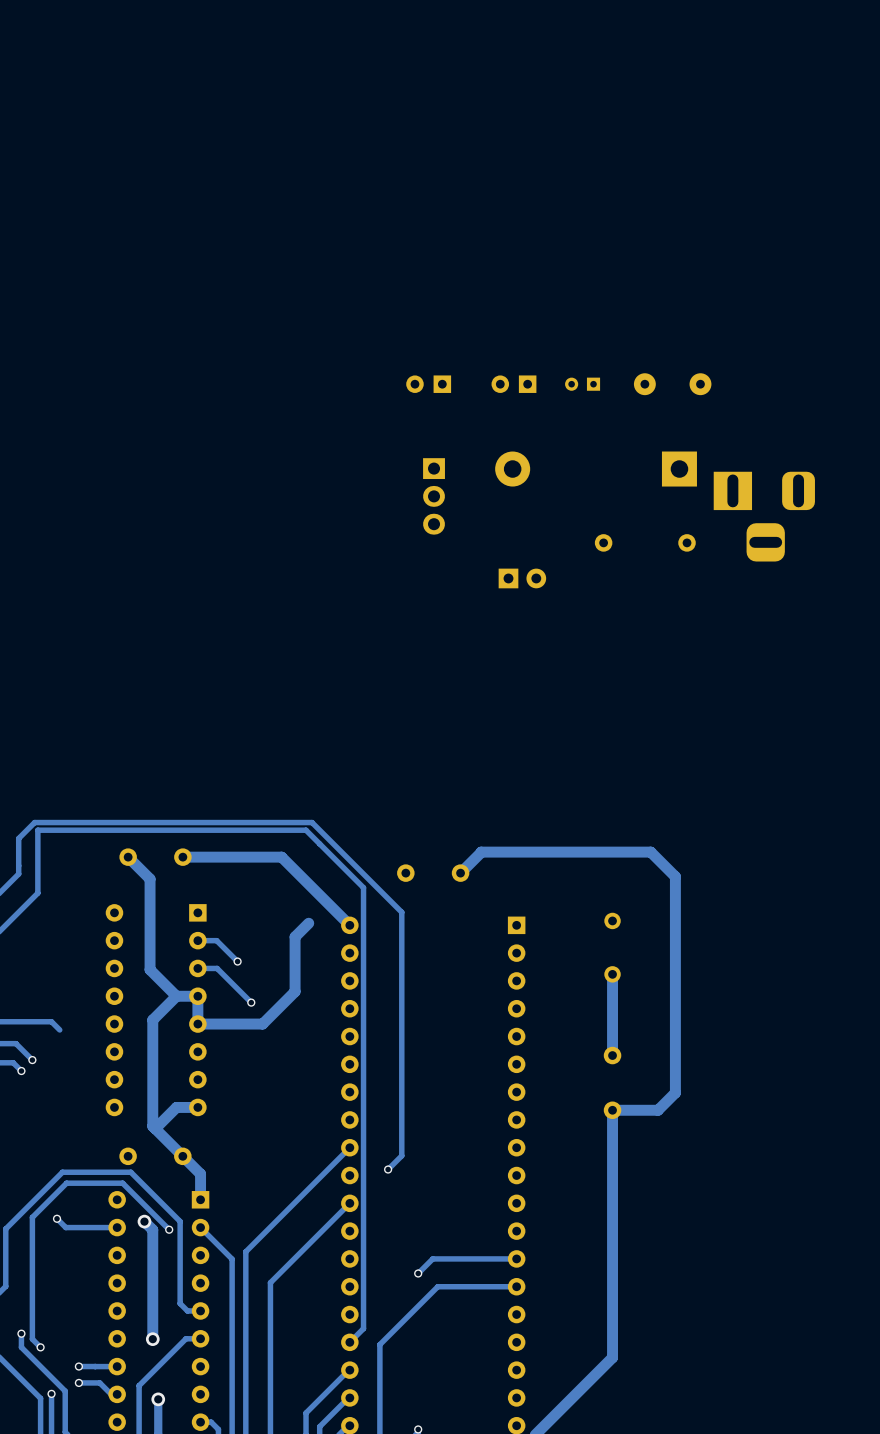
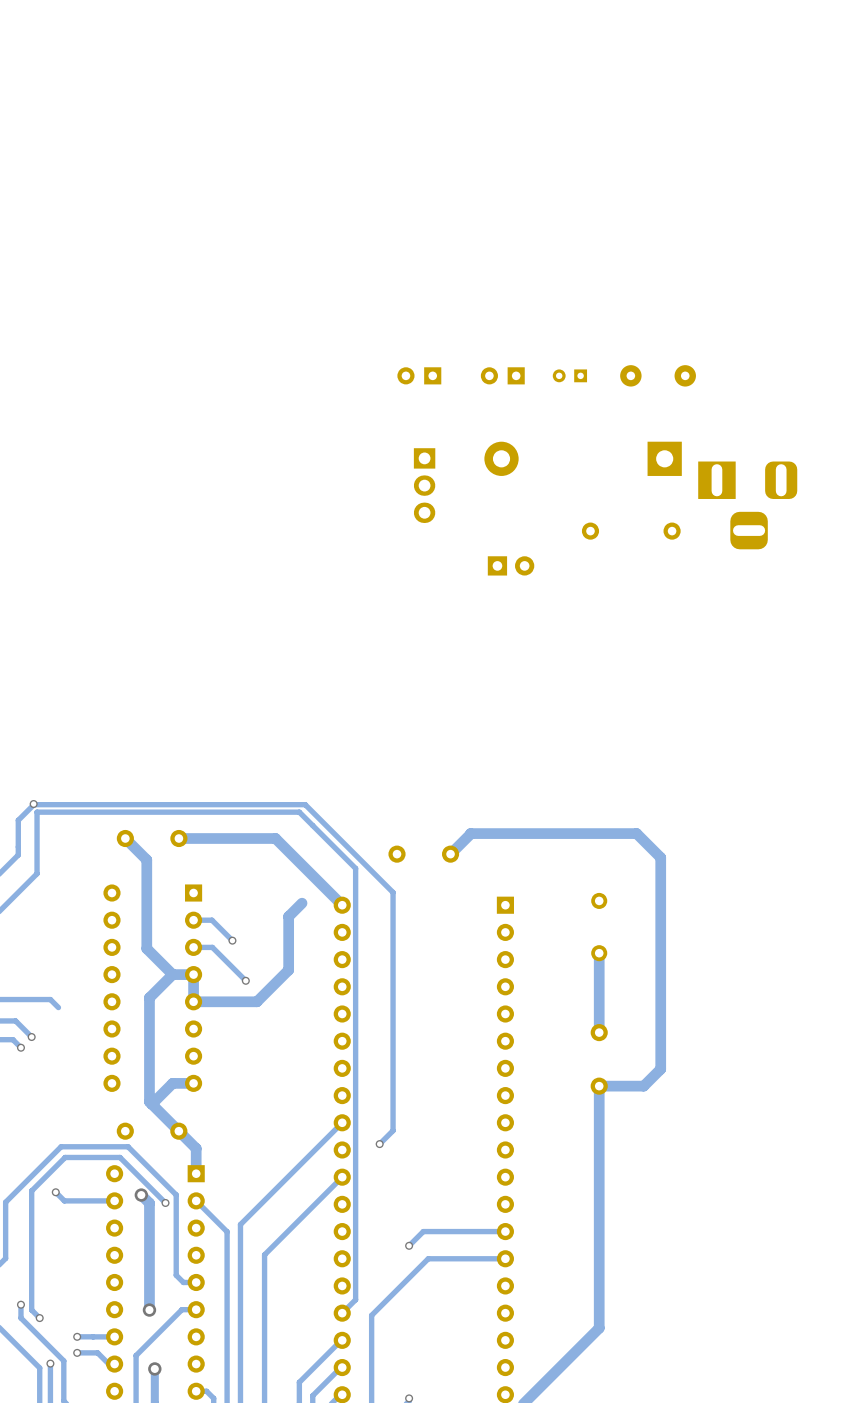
via: none -> (33, 804)

